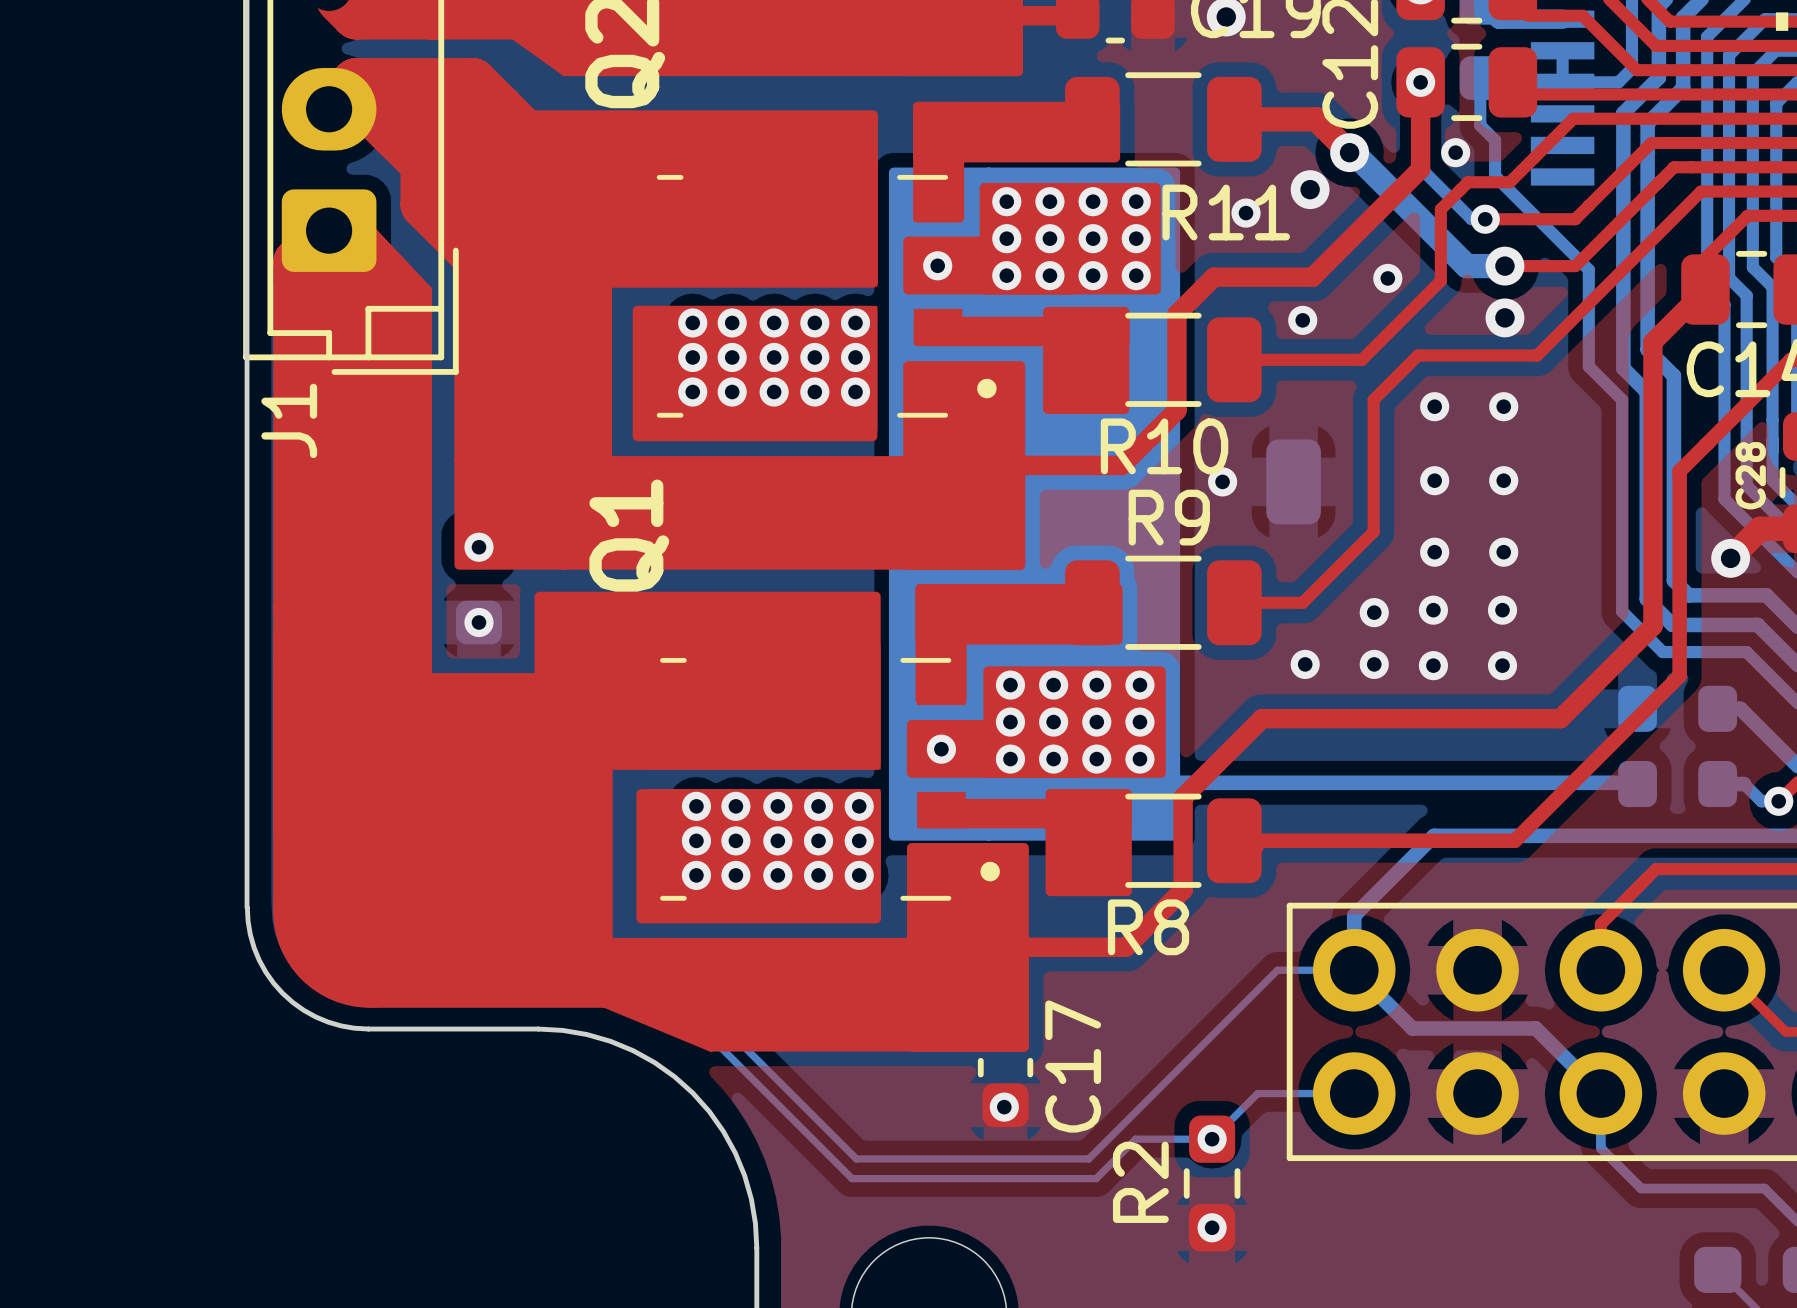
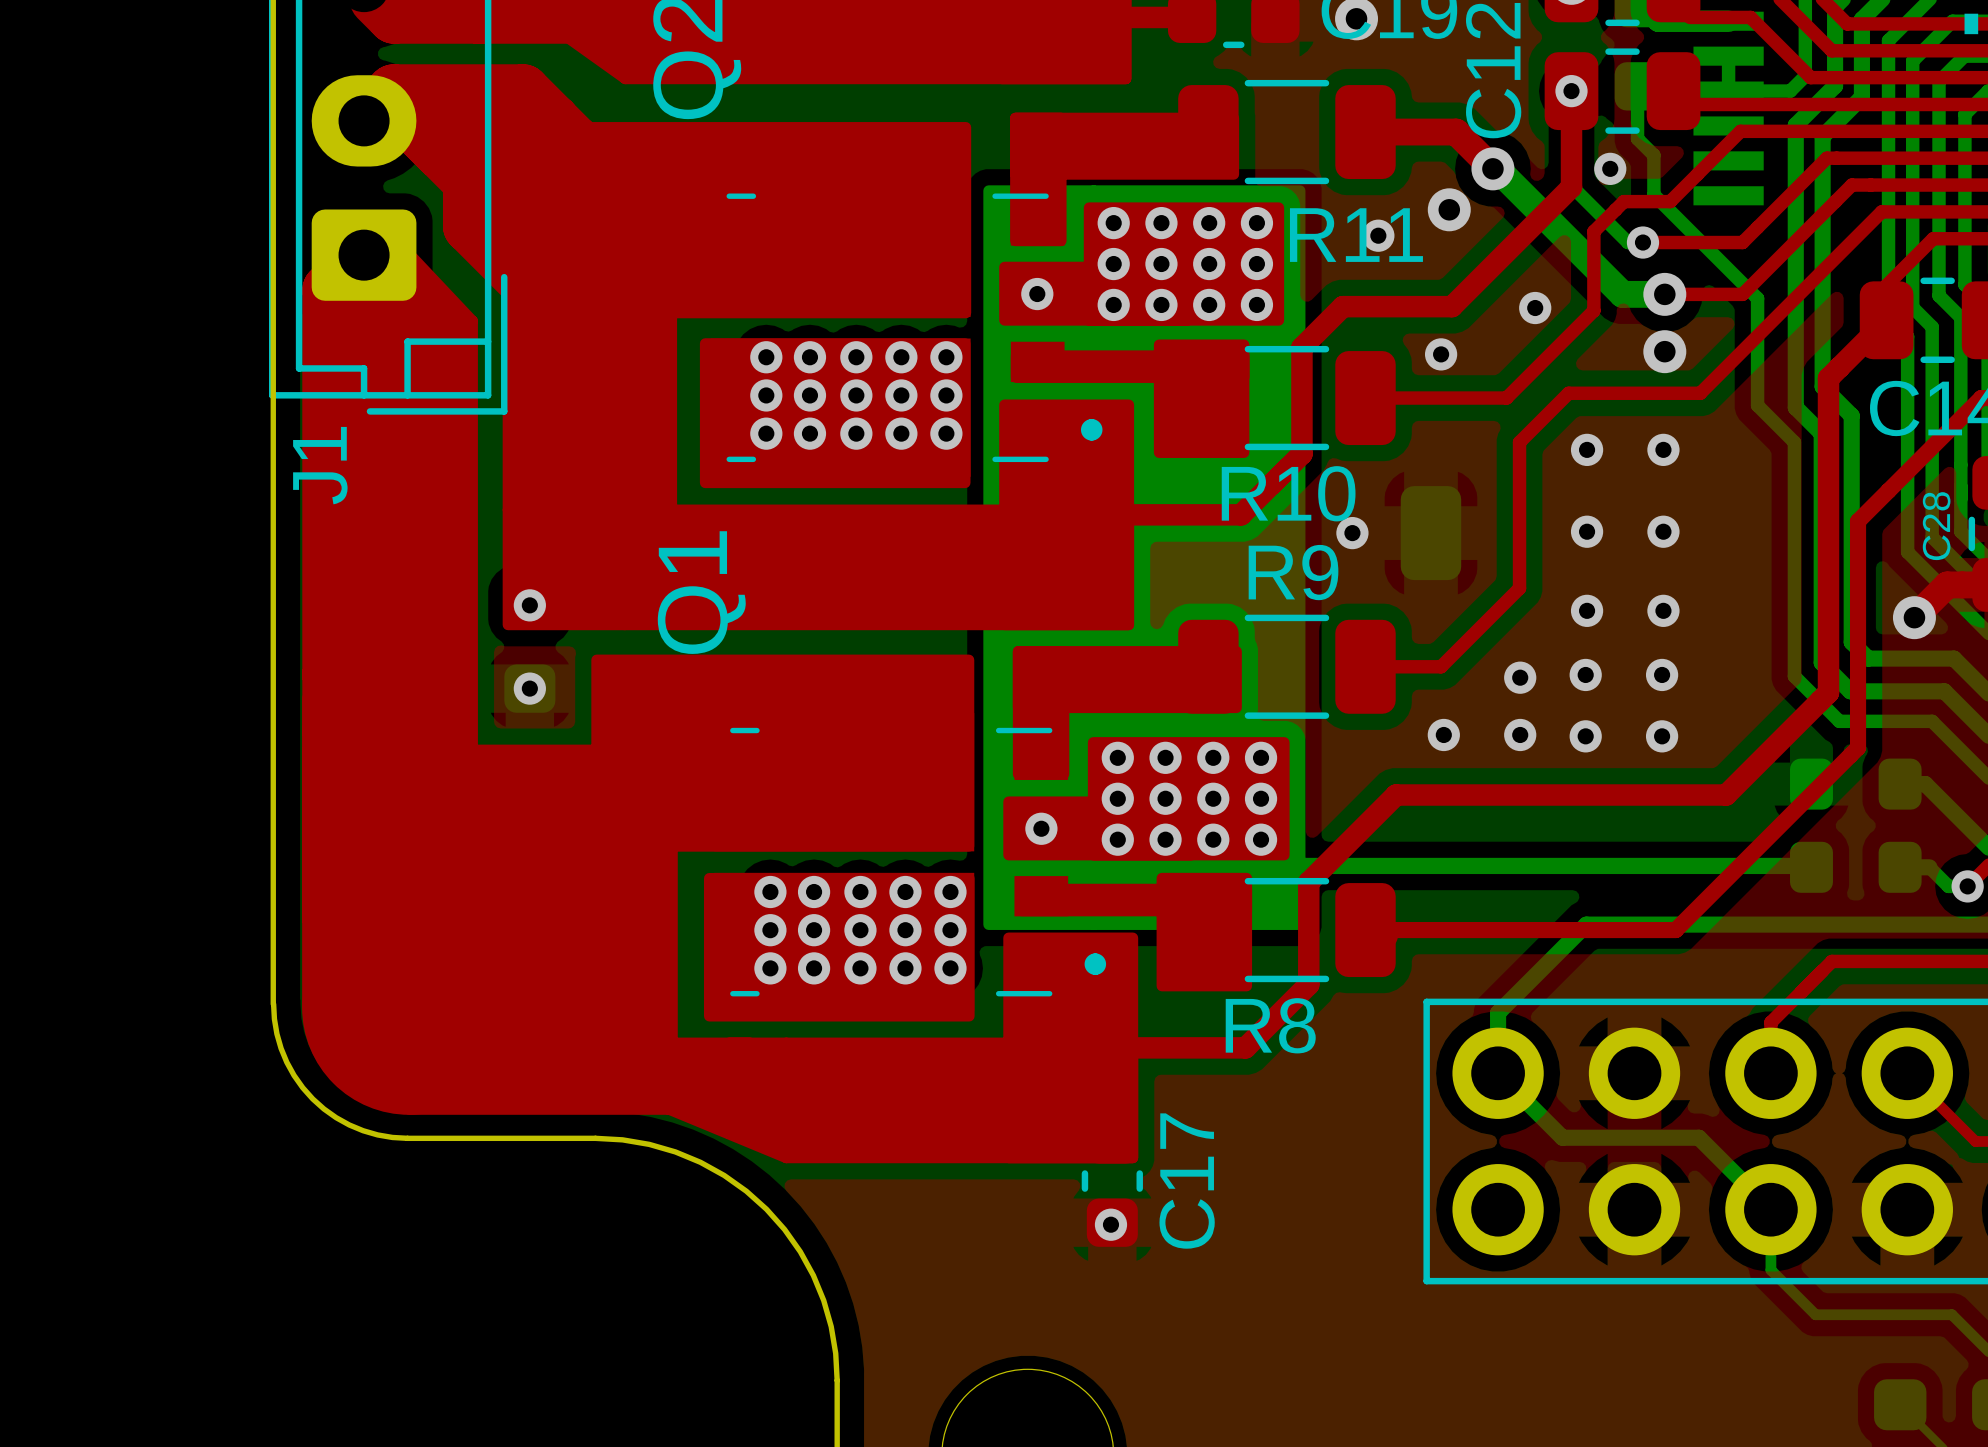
bottom track: (464, 750) (468, 750) (509, 791) (509, 959) (528, 978) (676, 978) (856, 1158) (1088, 1158) (1277, 970) (1354, 970) -> none
bottom track: (464, 830) (464, 944) (516, 996) (669, 996) (852, 1178) (1096, 1178) (1135, 1139) (1212, 1139) (1257, 1093) (1354, 1093) -> none
via: (1212, 1139) -> none
R2: (1212, 1183) -> none
via: (1212, 1227) -> none

